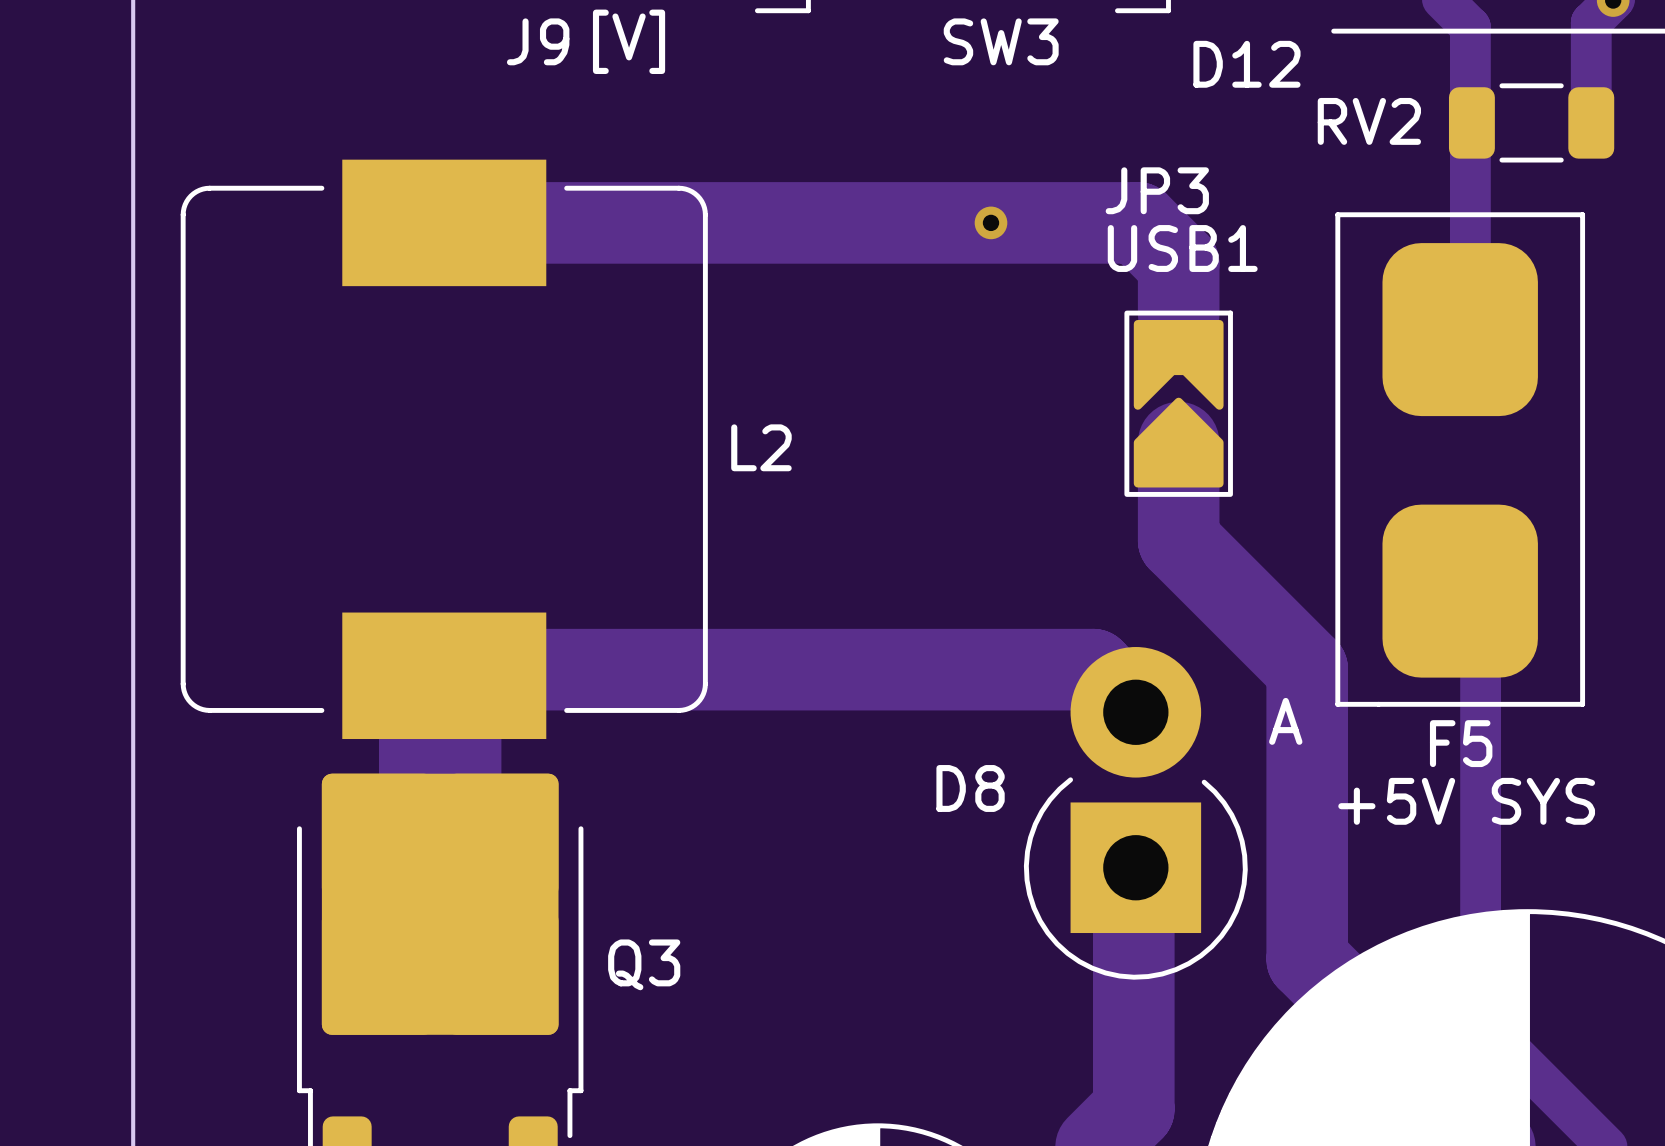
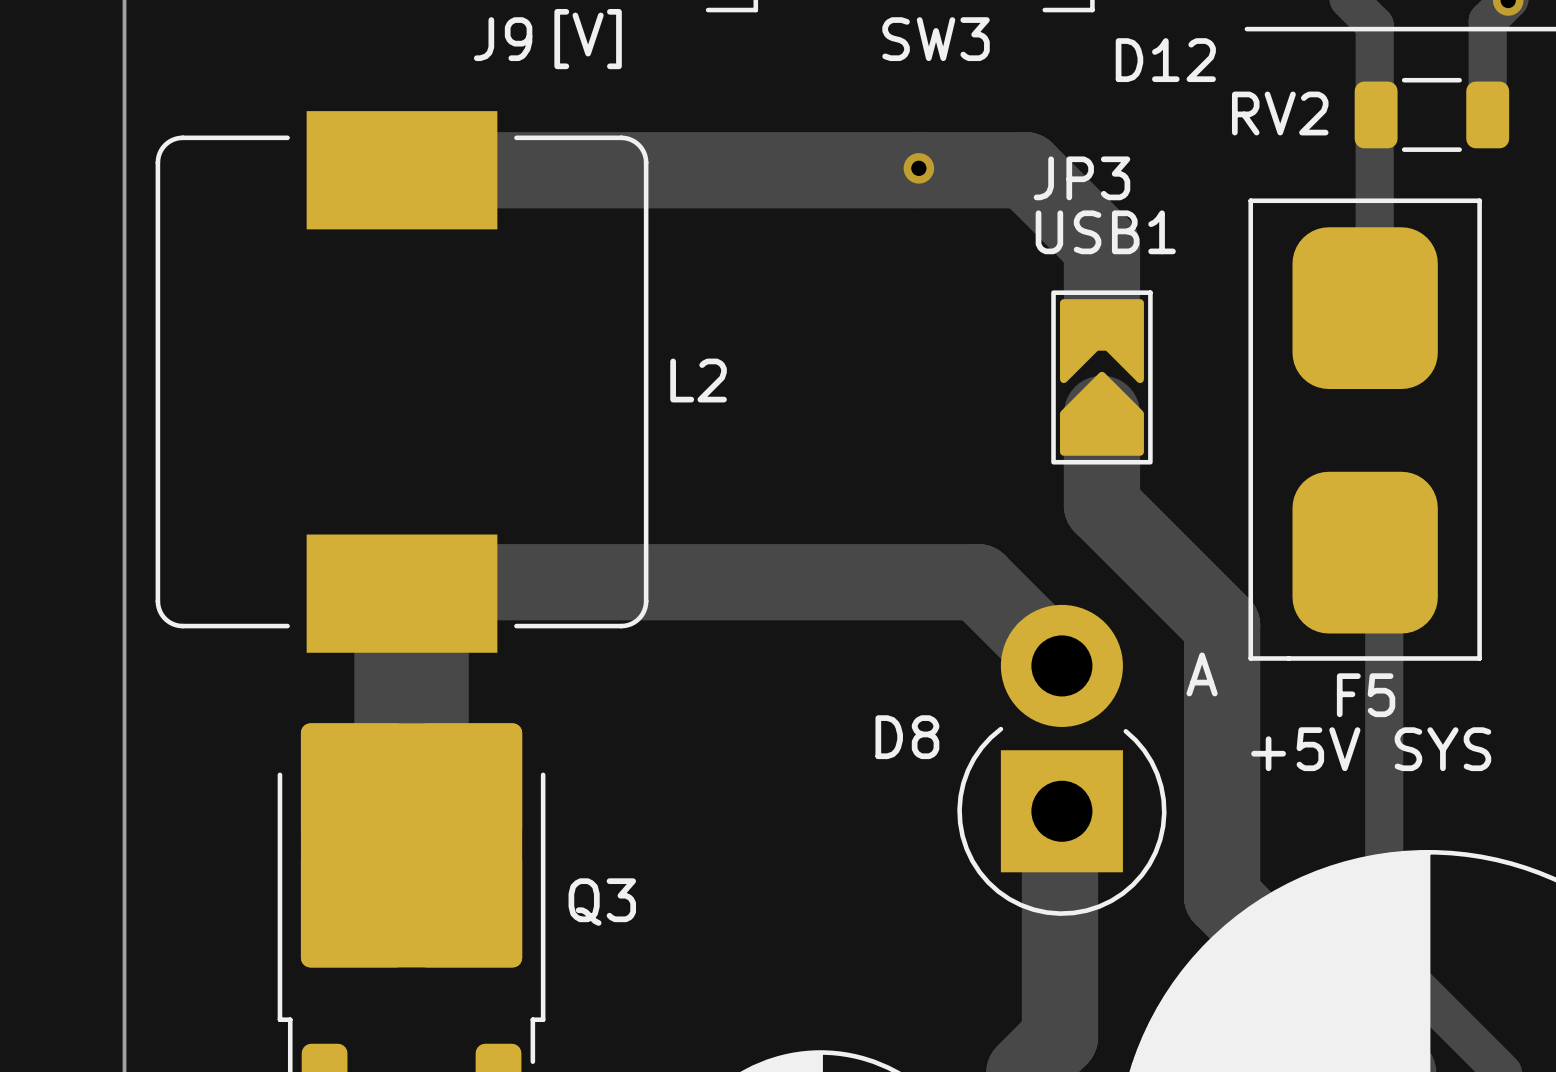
track: none -> (402, 170) (916, 170)
track: (444, 222) (1137, 222) -> (920, 170) (1025, 170) (1063, 208)
via position: (991, 222) -> (918, 168)
L2 position: (444, 449) -> (402, 381)
track: (489, 669) (1093, 669) -> (413, 582) (978, 582) (1022, 626)

